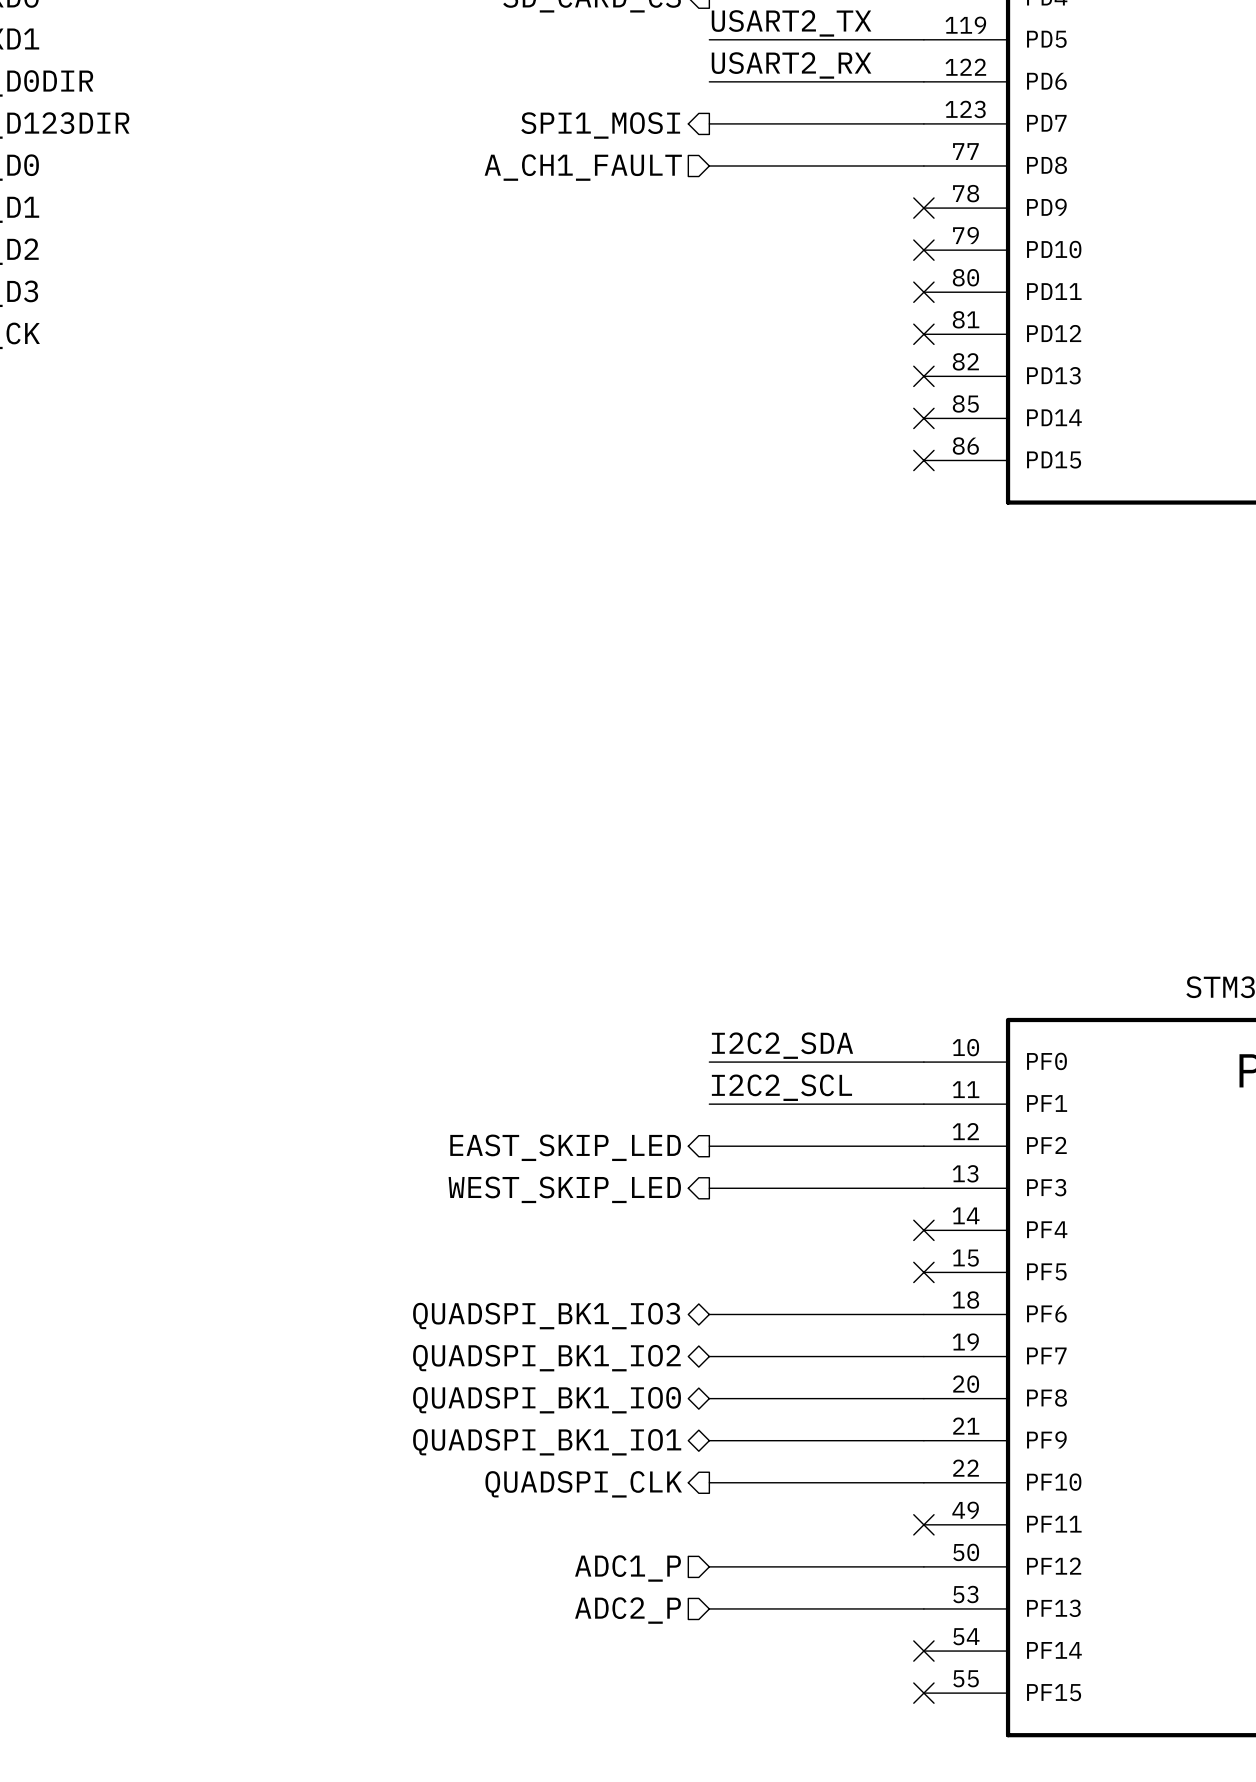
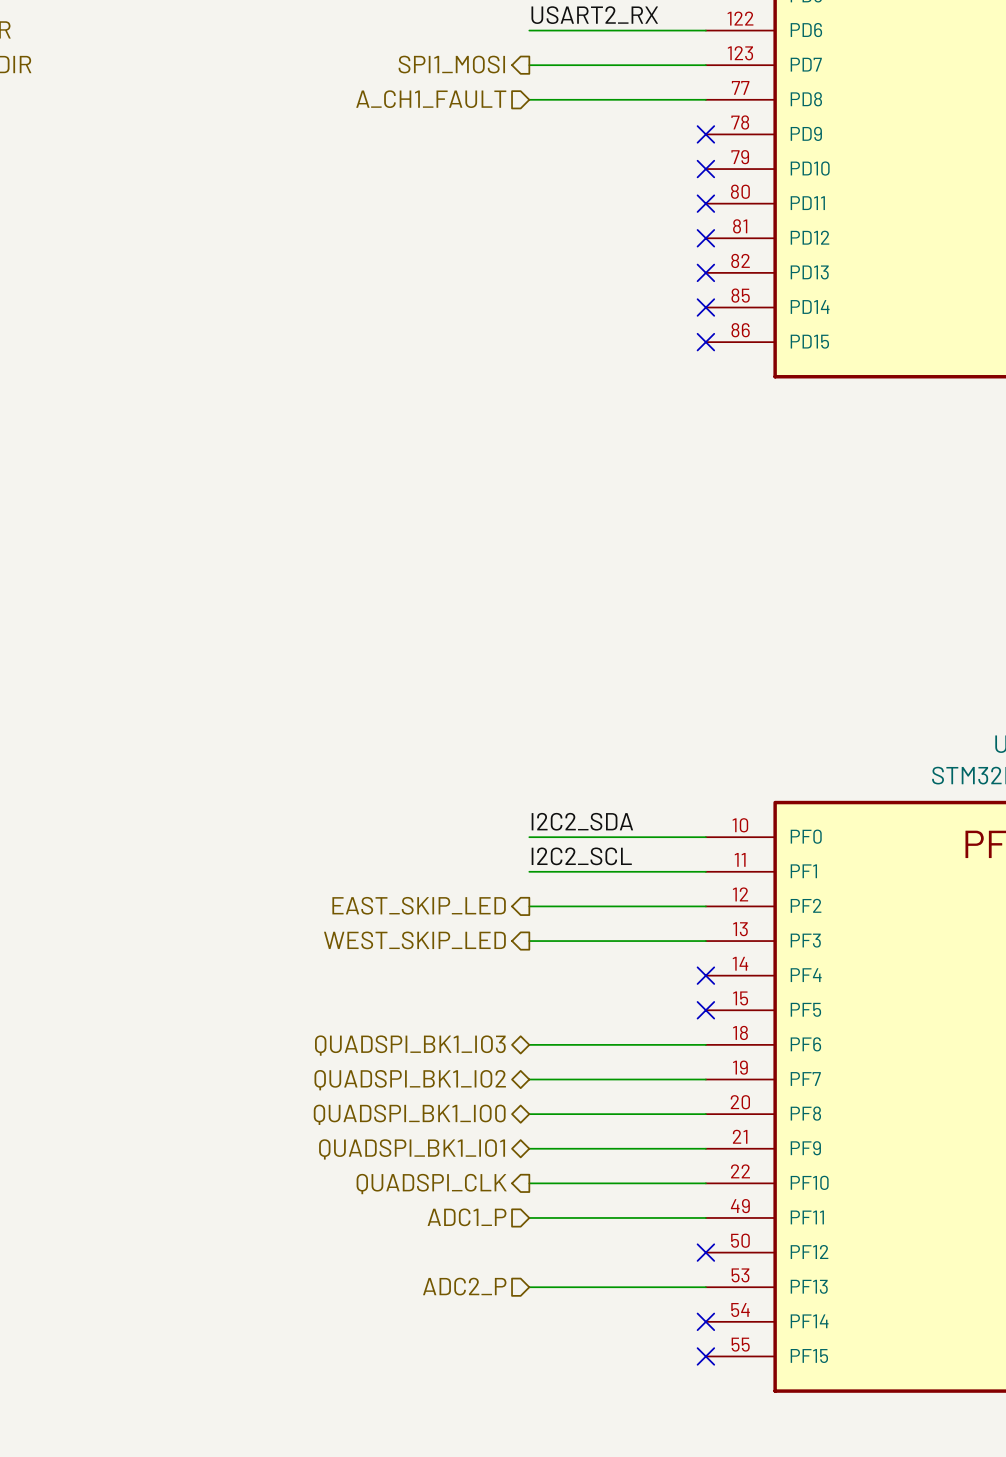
no-connect mark position: (923, 1524) -> (705, 1252)
wire: (709, 1566) (923, 1566) -> (529, 1217) (705, 1217)
hierarchical label position: ADC1_P (628, 1568) -> ADC1_P (467, 1217)

